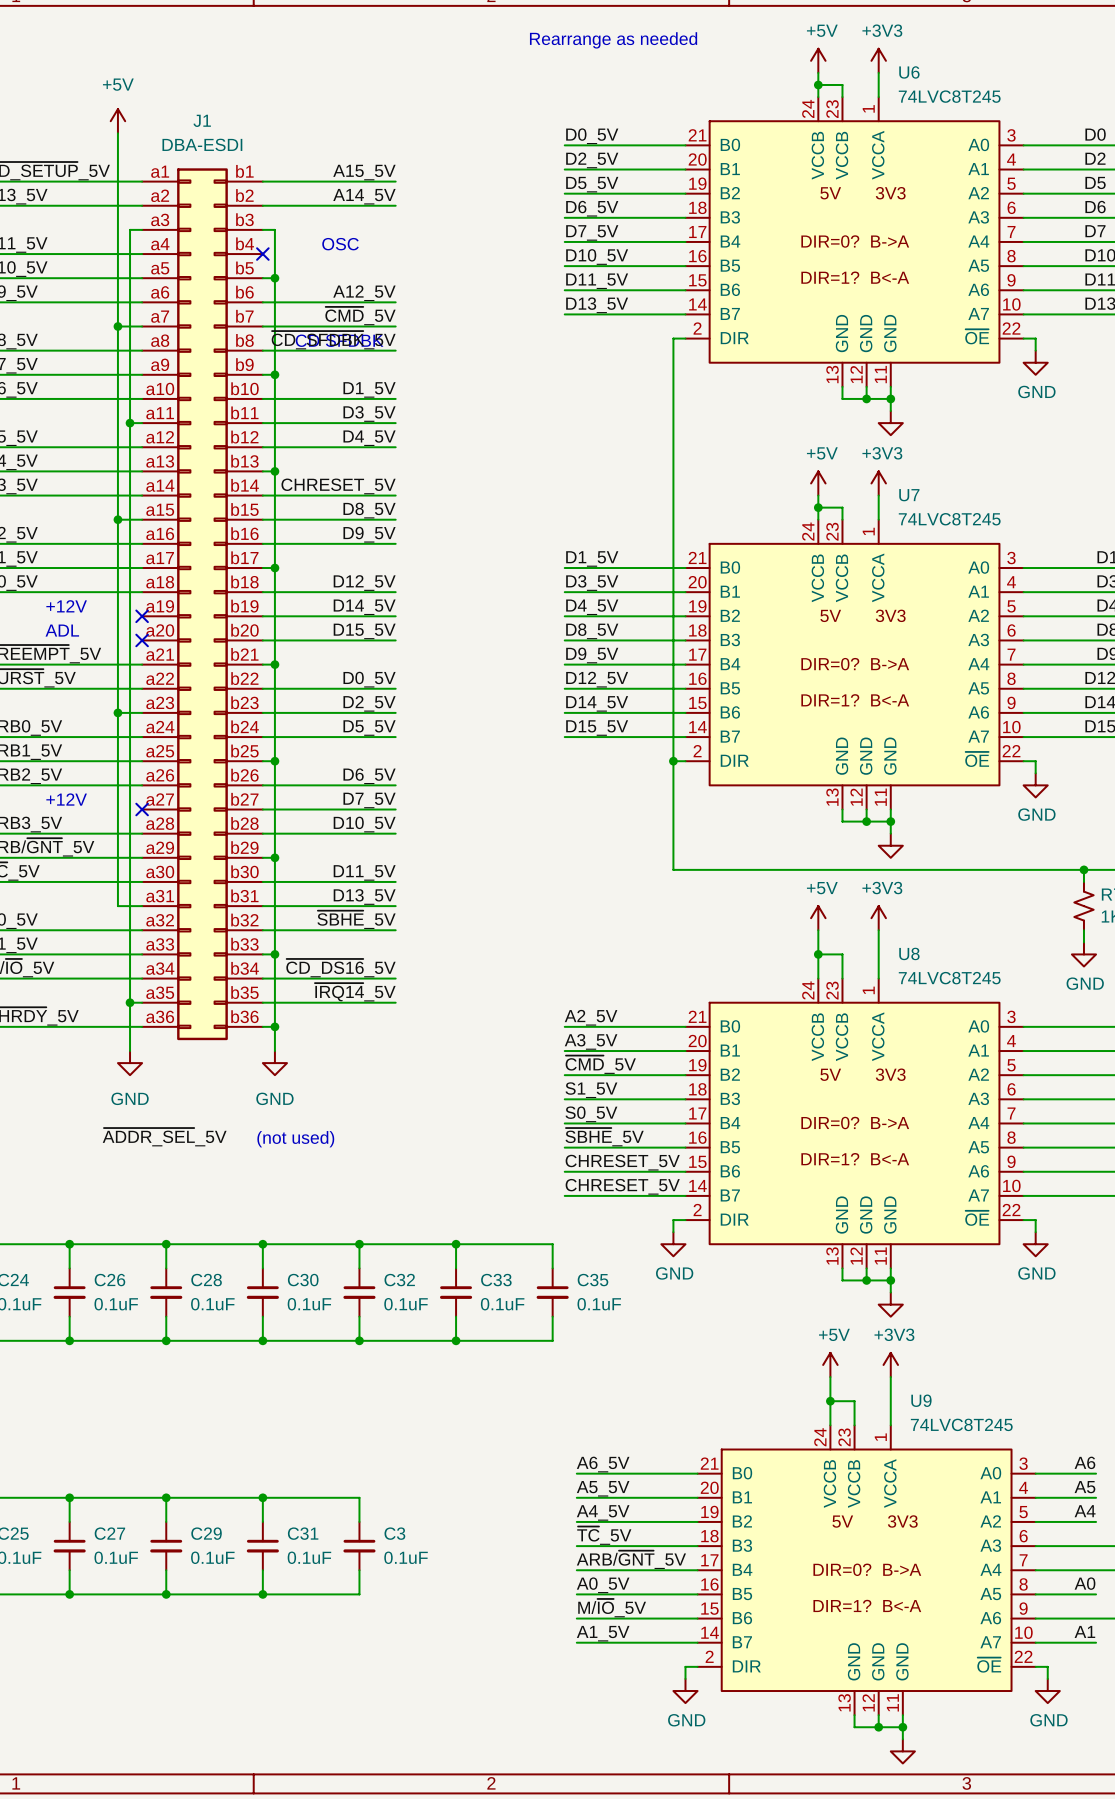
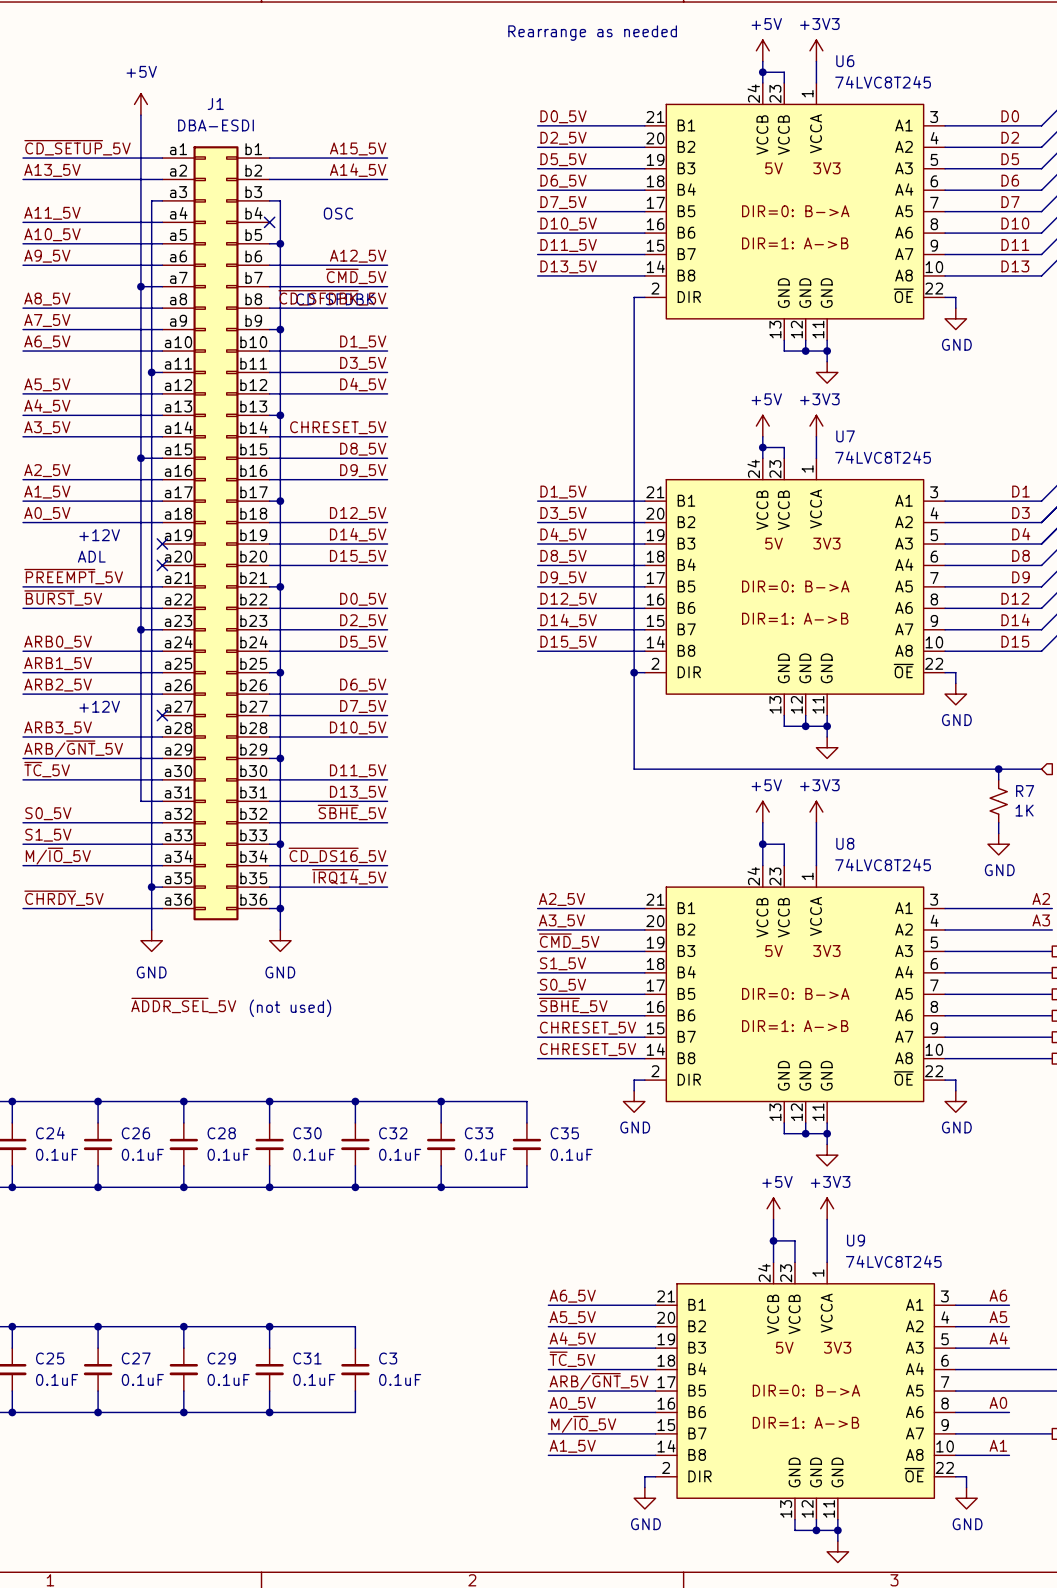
U6 symbol: [685, 97, 1024, 387] -> [644, 82, 946, 341]
U7 symbol: [685, 519, 1024, 810] -> [644, 458, 946, 716]
U8 symbol: [685, 978, 1024, 1269] -> [644, 865, 946, 1123]
U9 symbol: [697, 1425, 1036, 1716] -> [655, 1262, 956, 1520]

